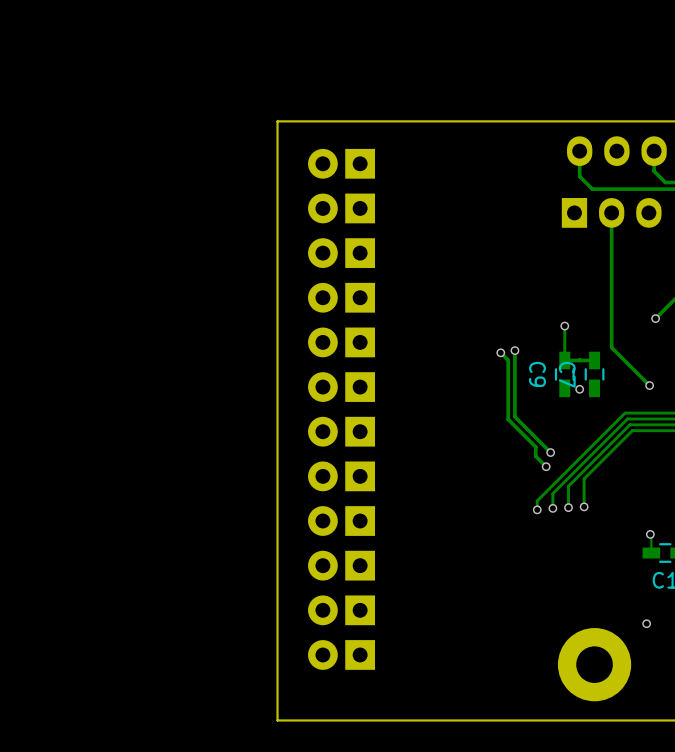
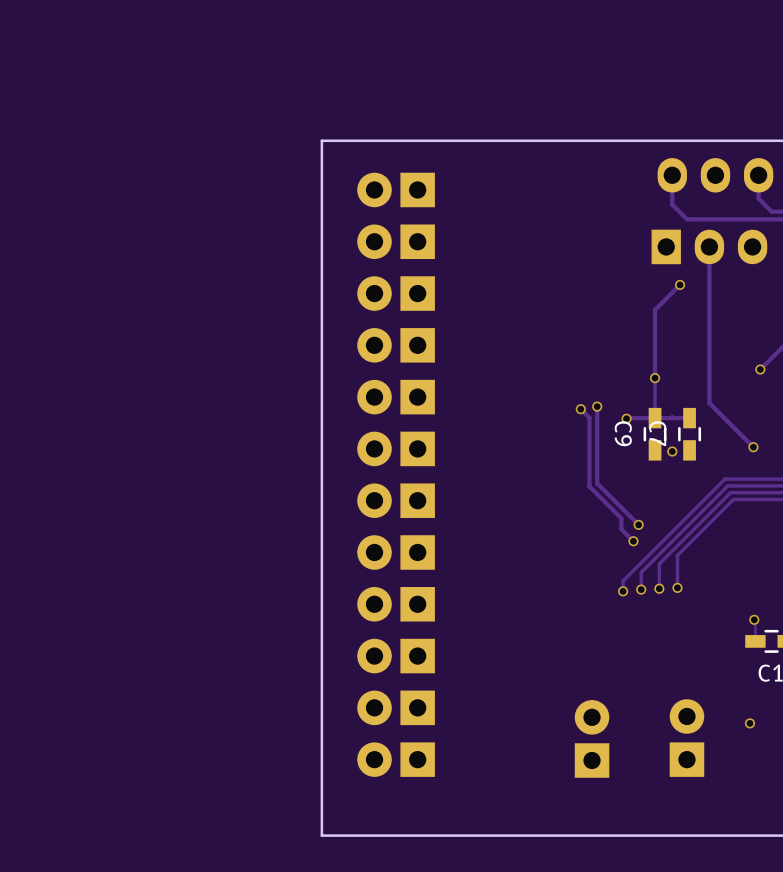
track: none -> (680, 284) (655, 309) (655, 378)
via: none -> (680, 284)
track: none -> (655, 418) (626, 418)
via: none -> (626, 418)
part: none -> (686, 738)
part: none -> (592, 738)
part: (594, 664) -> none

